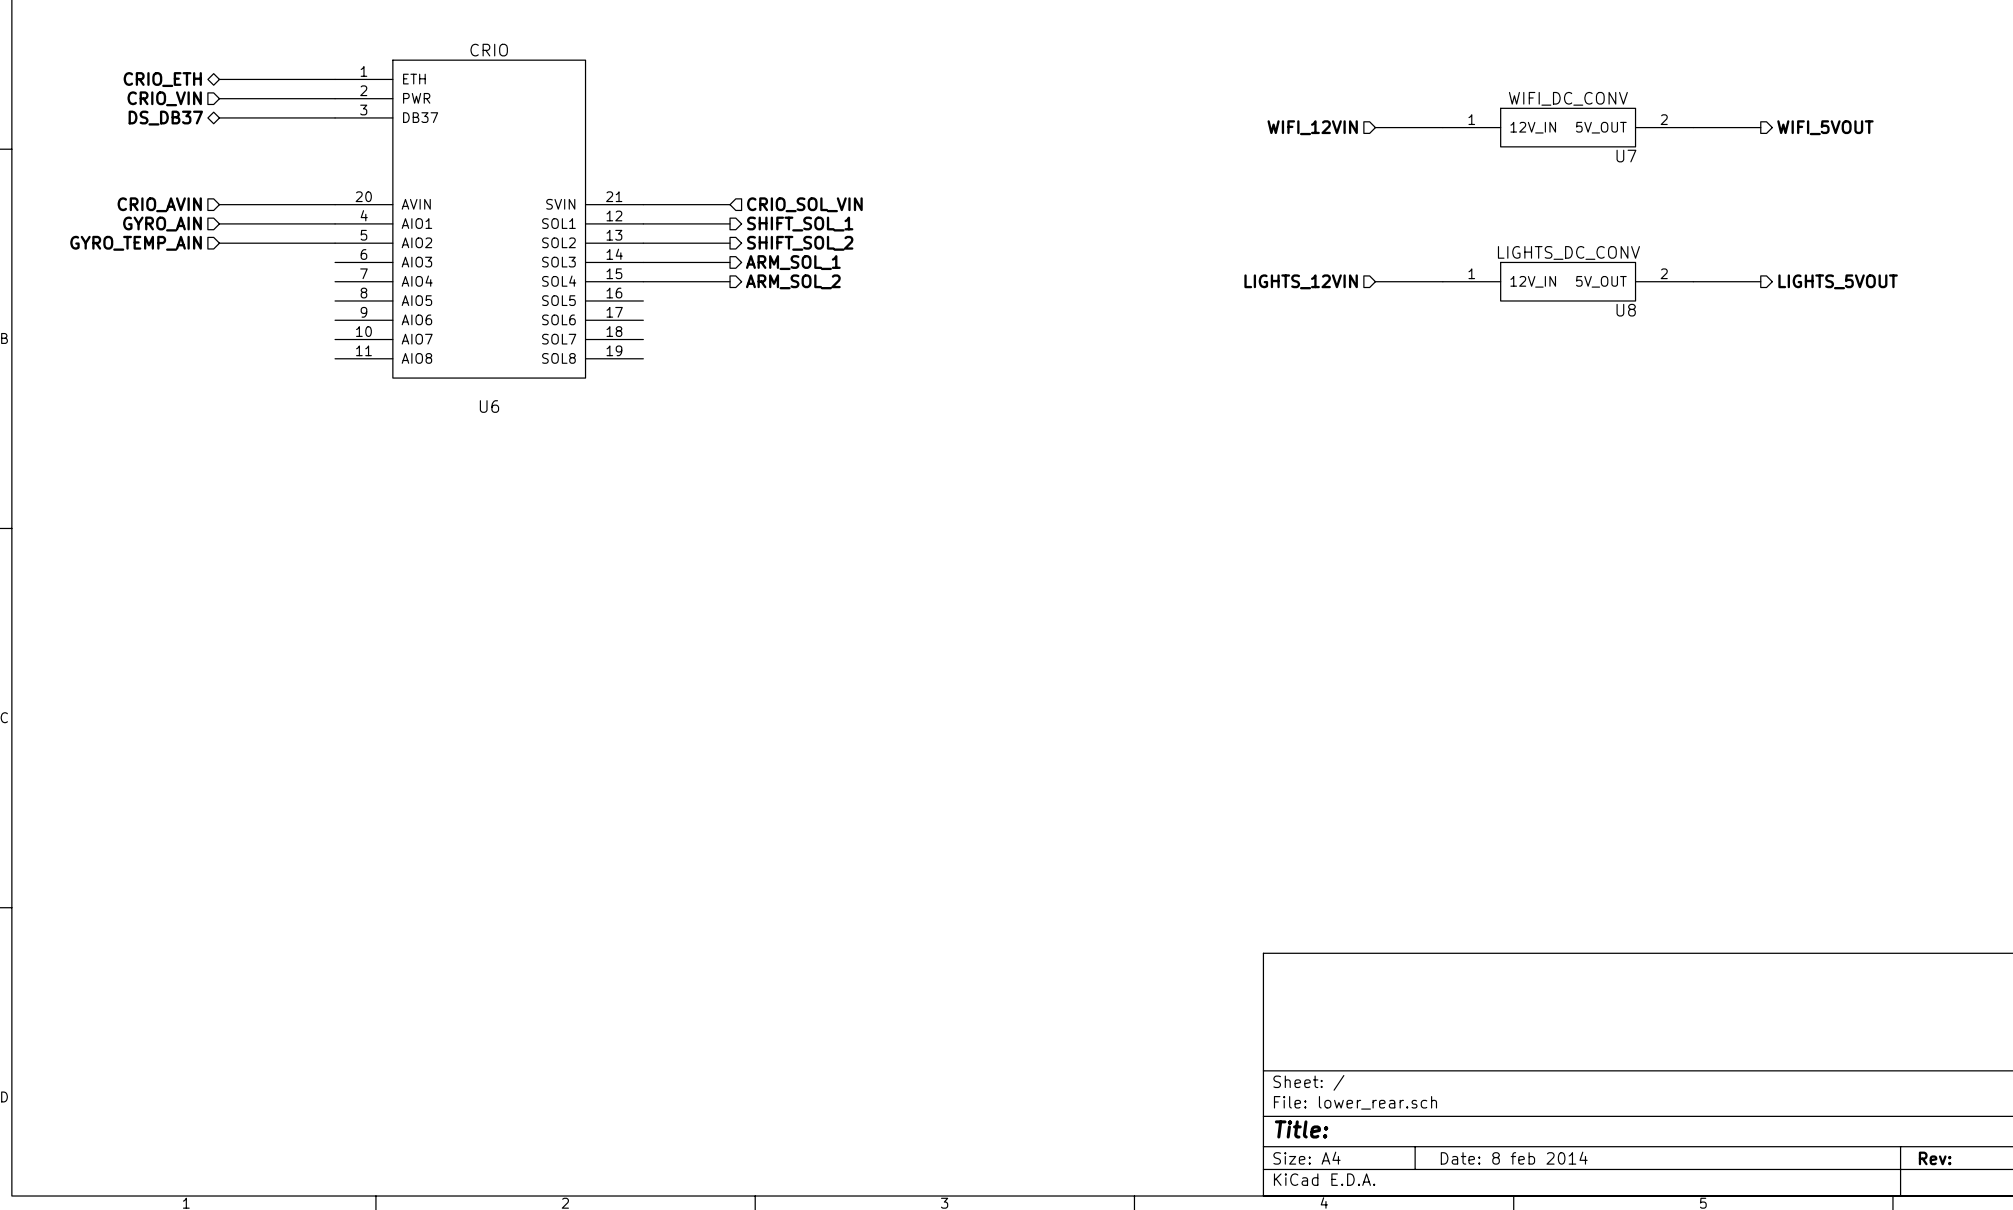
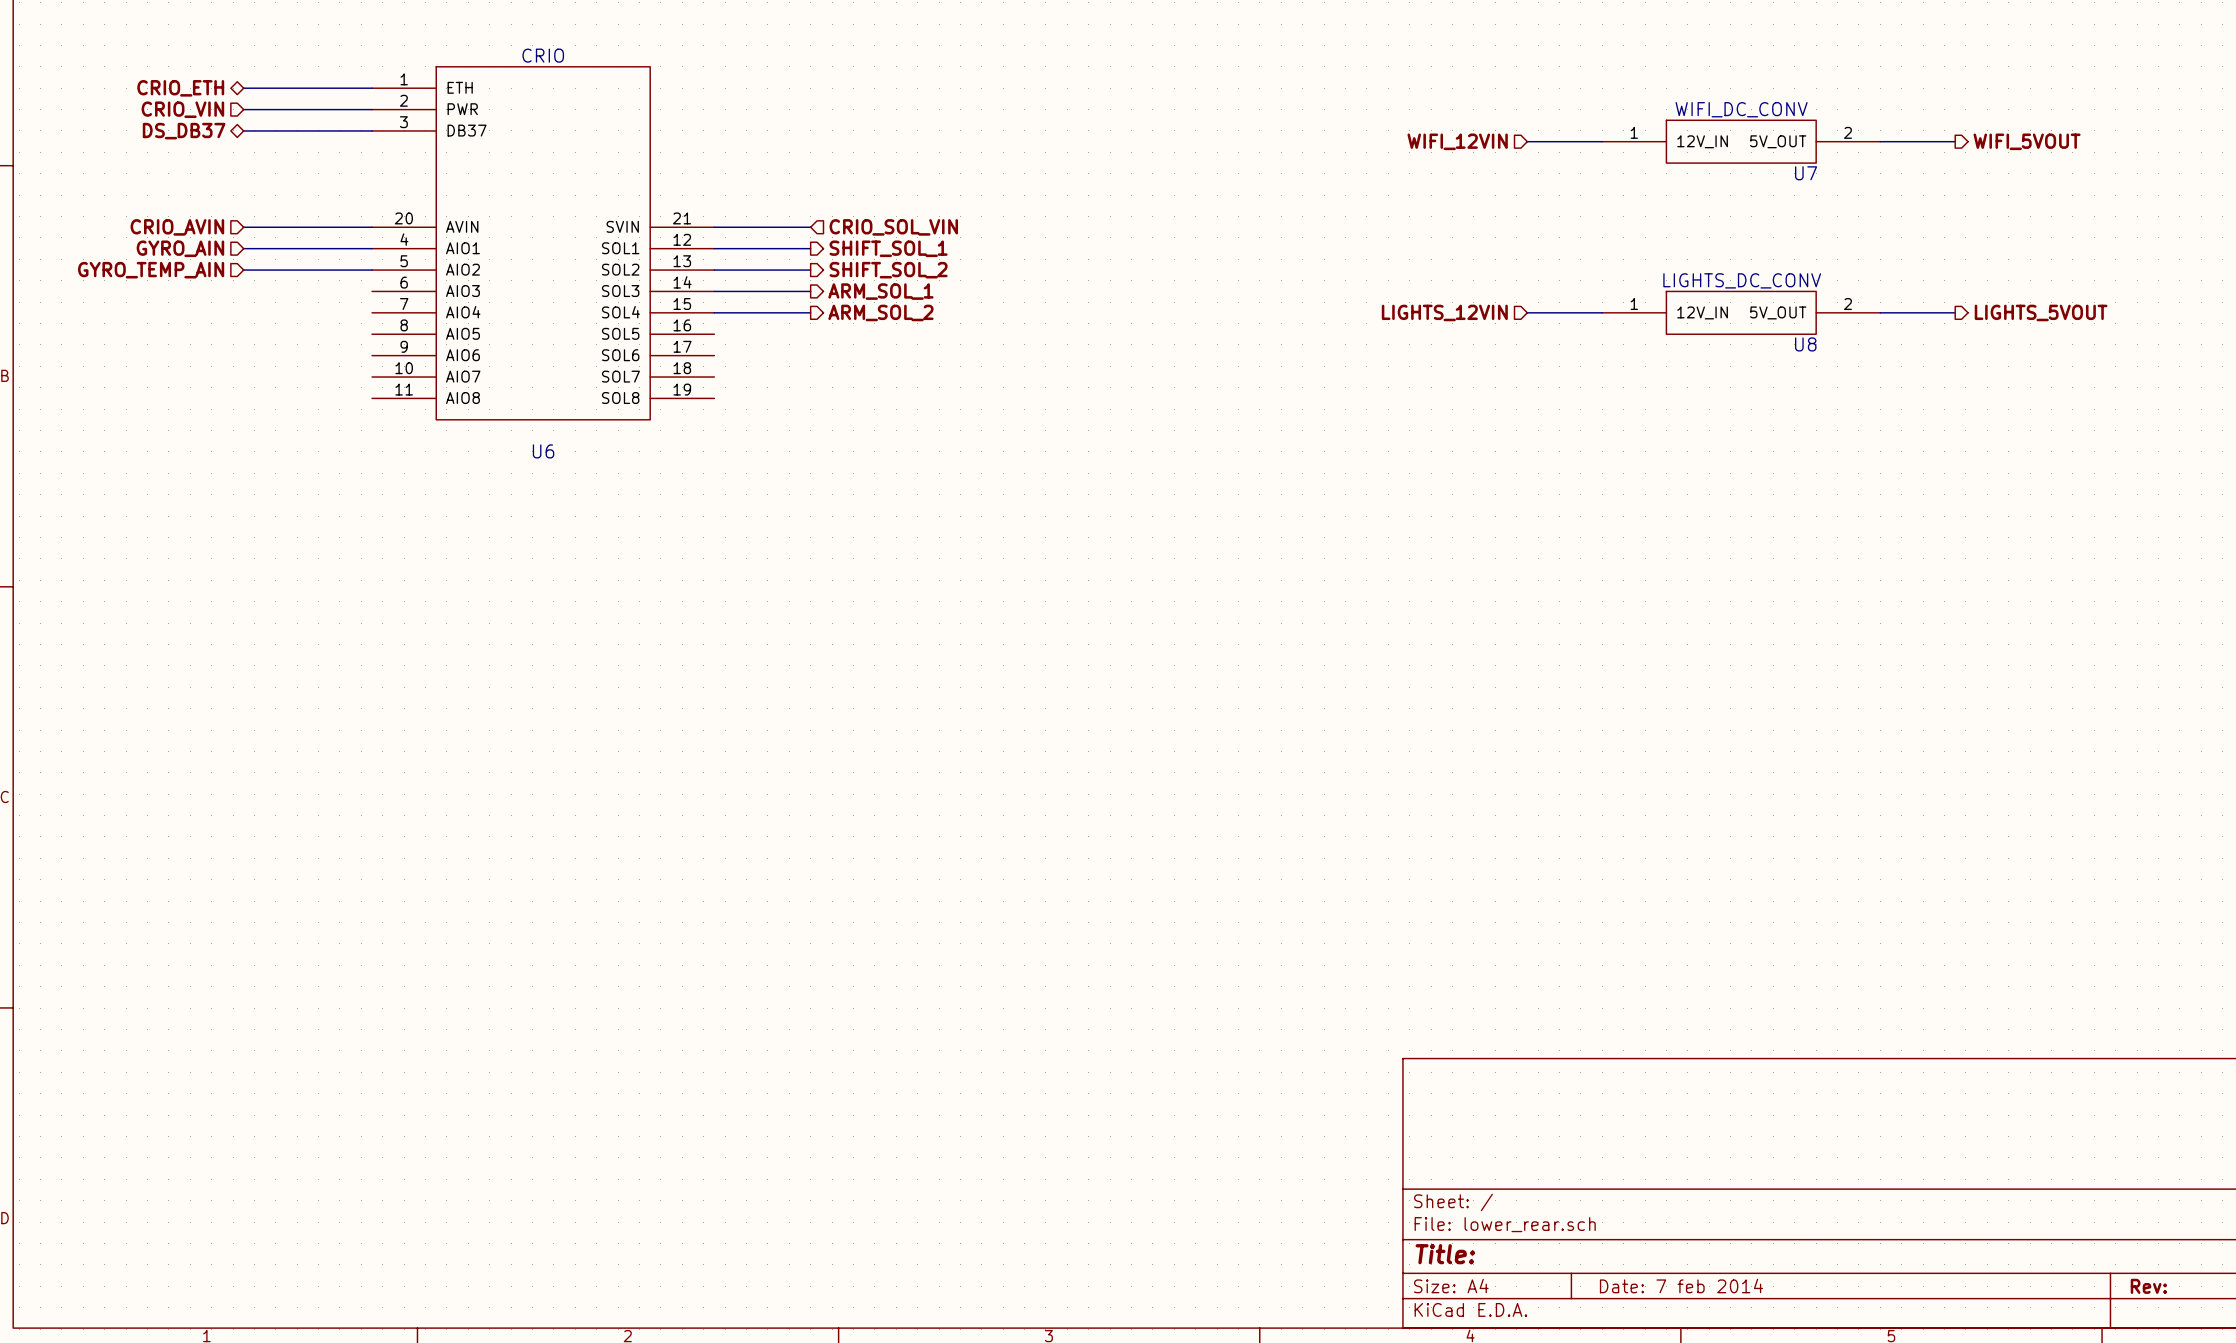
title block: Date: 8 feb 2014 (1514, 1158) -> Date: 7 feb 2014 (1681, 1286)

